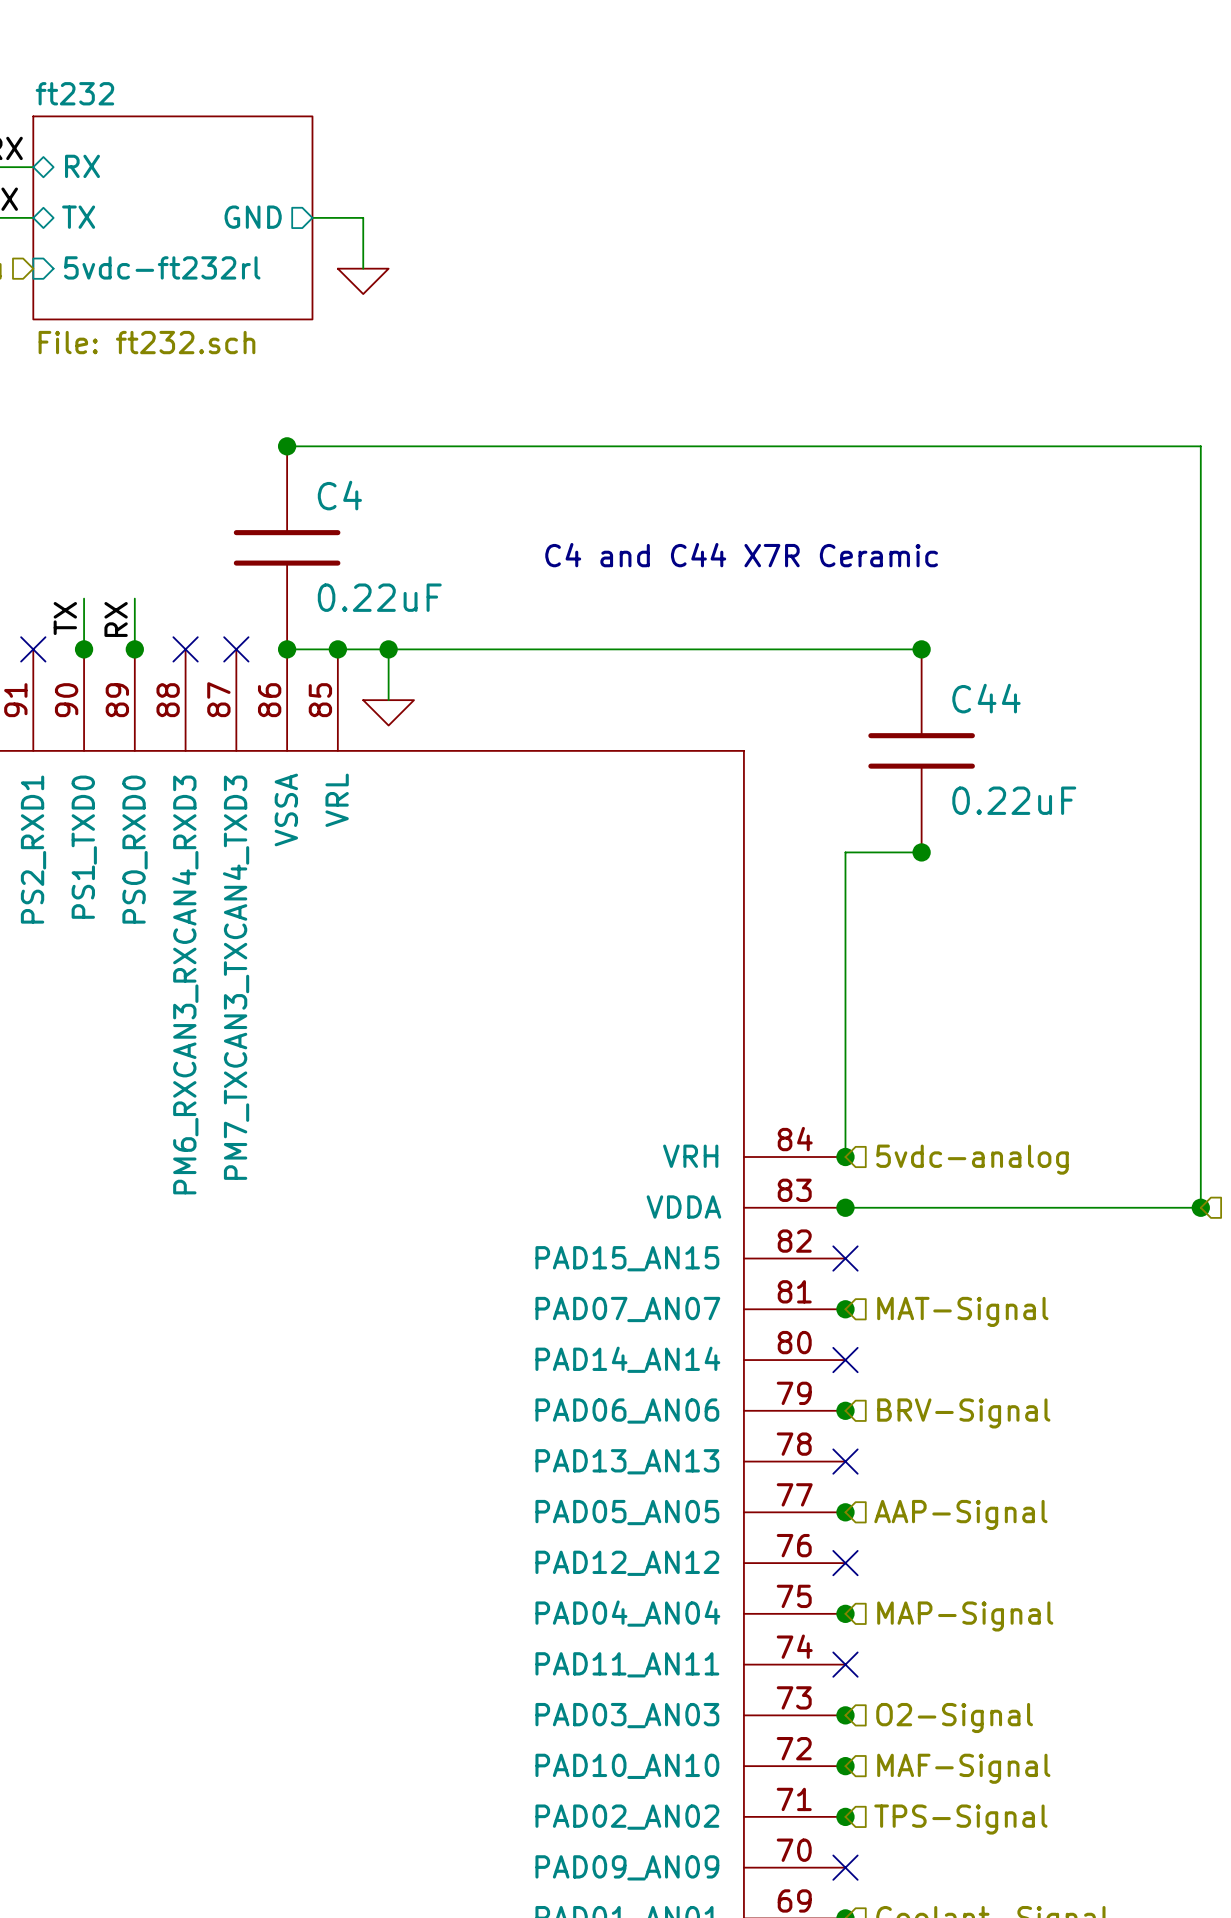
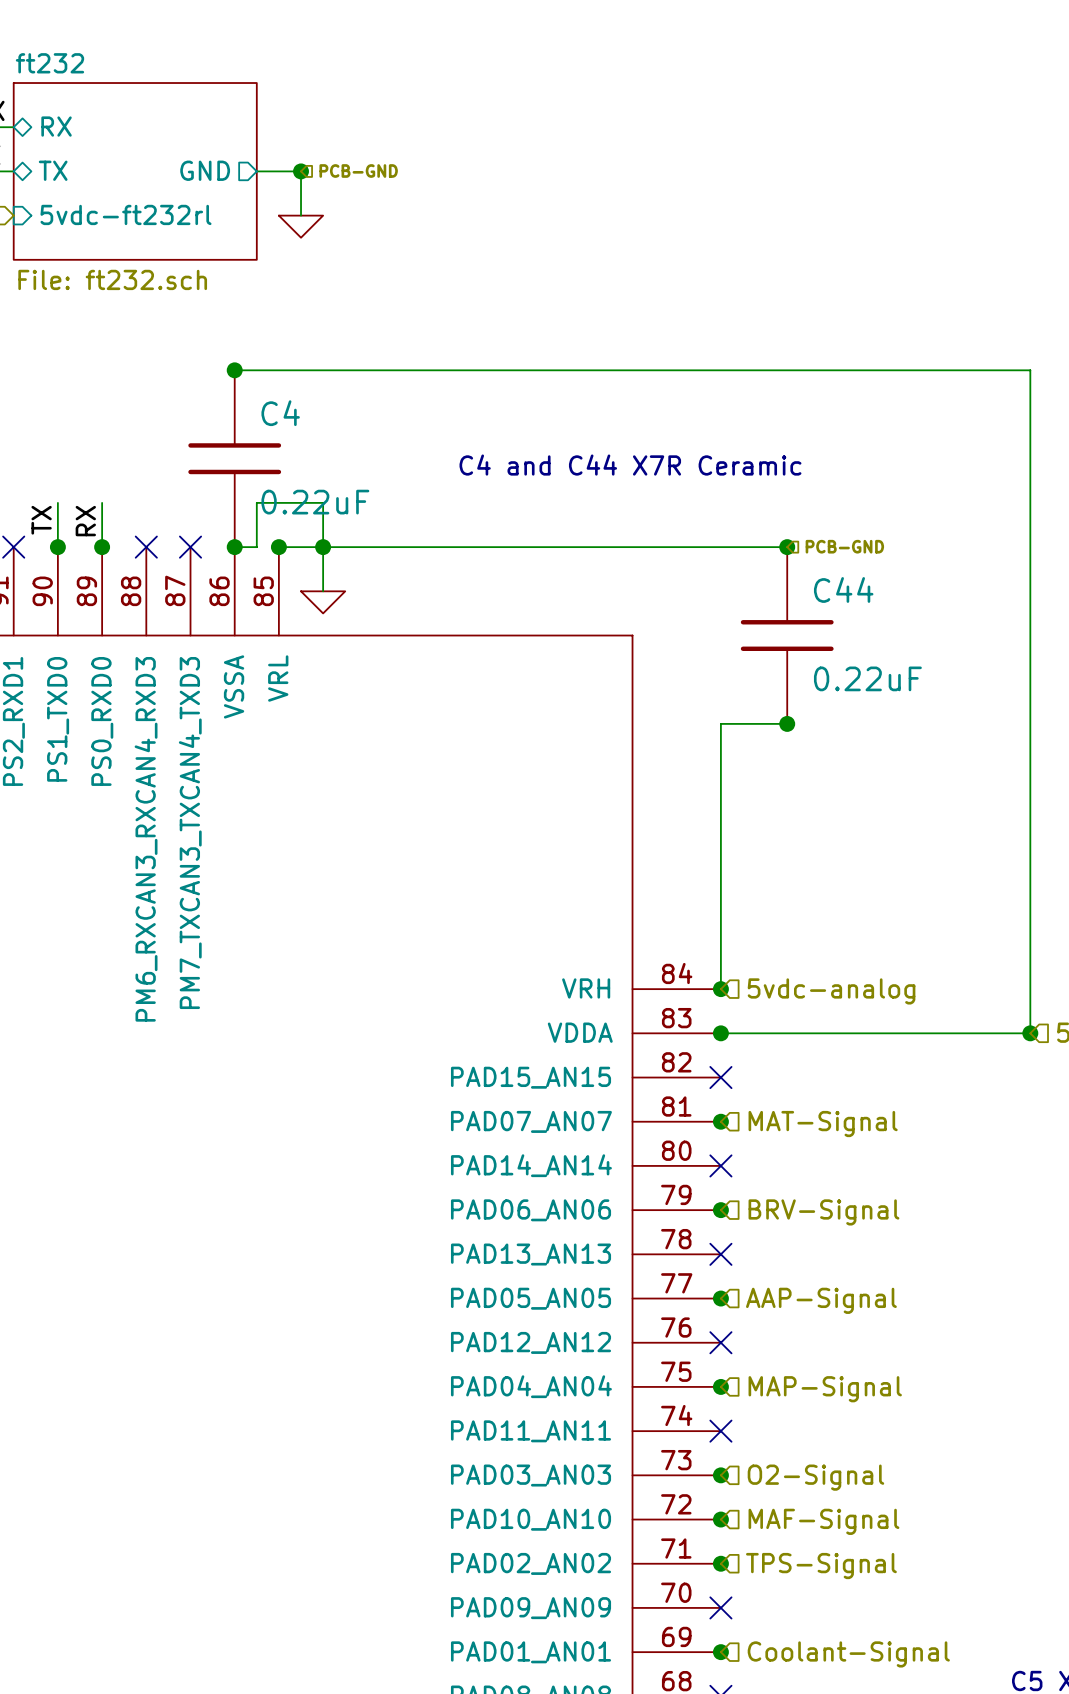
junction: none -> (301, 171)
hierarchical label: none -> PCB-GND (358, 171)
hierarchical label: none -> PCB-GND (844, 546)
wire: (312, 649) (337, 649) -> (256, 547) (256, 502) (323, 502) (323, 547)

